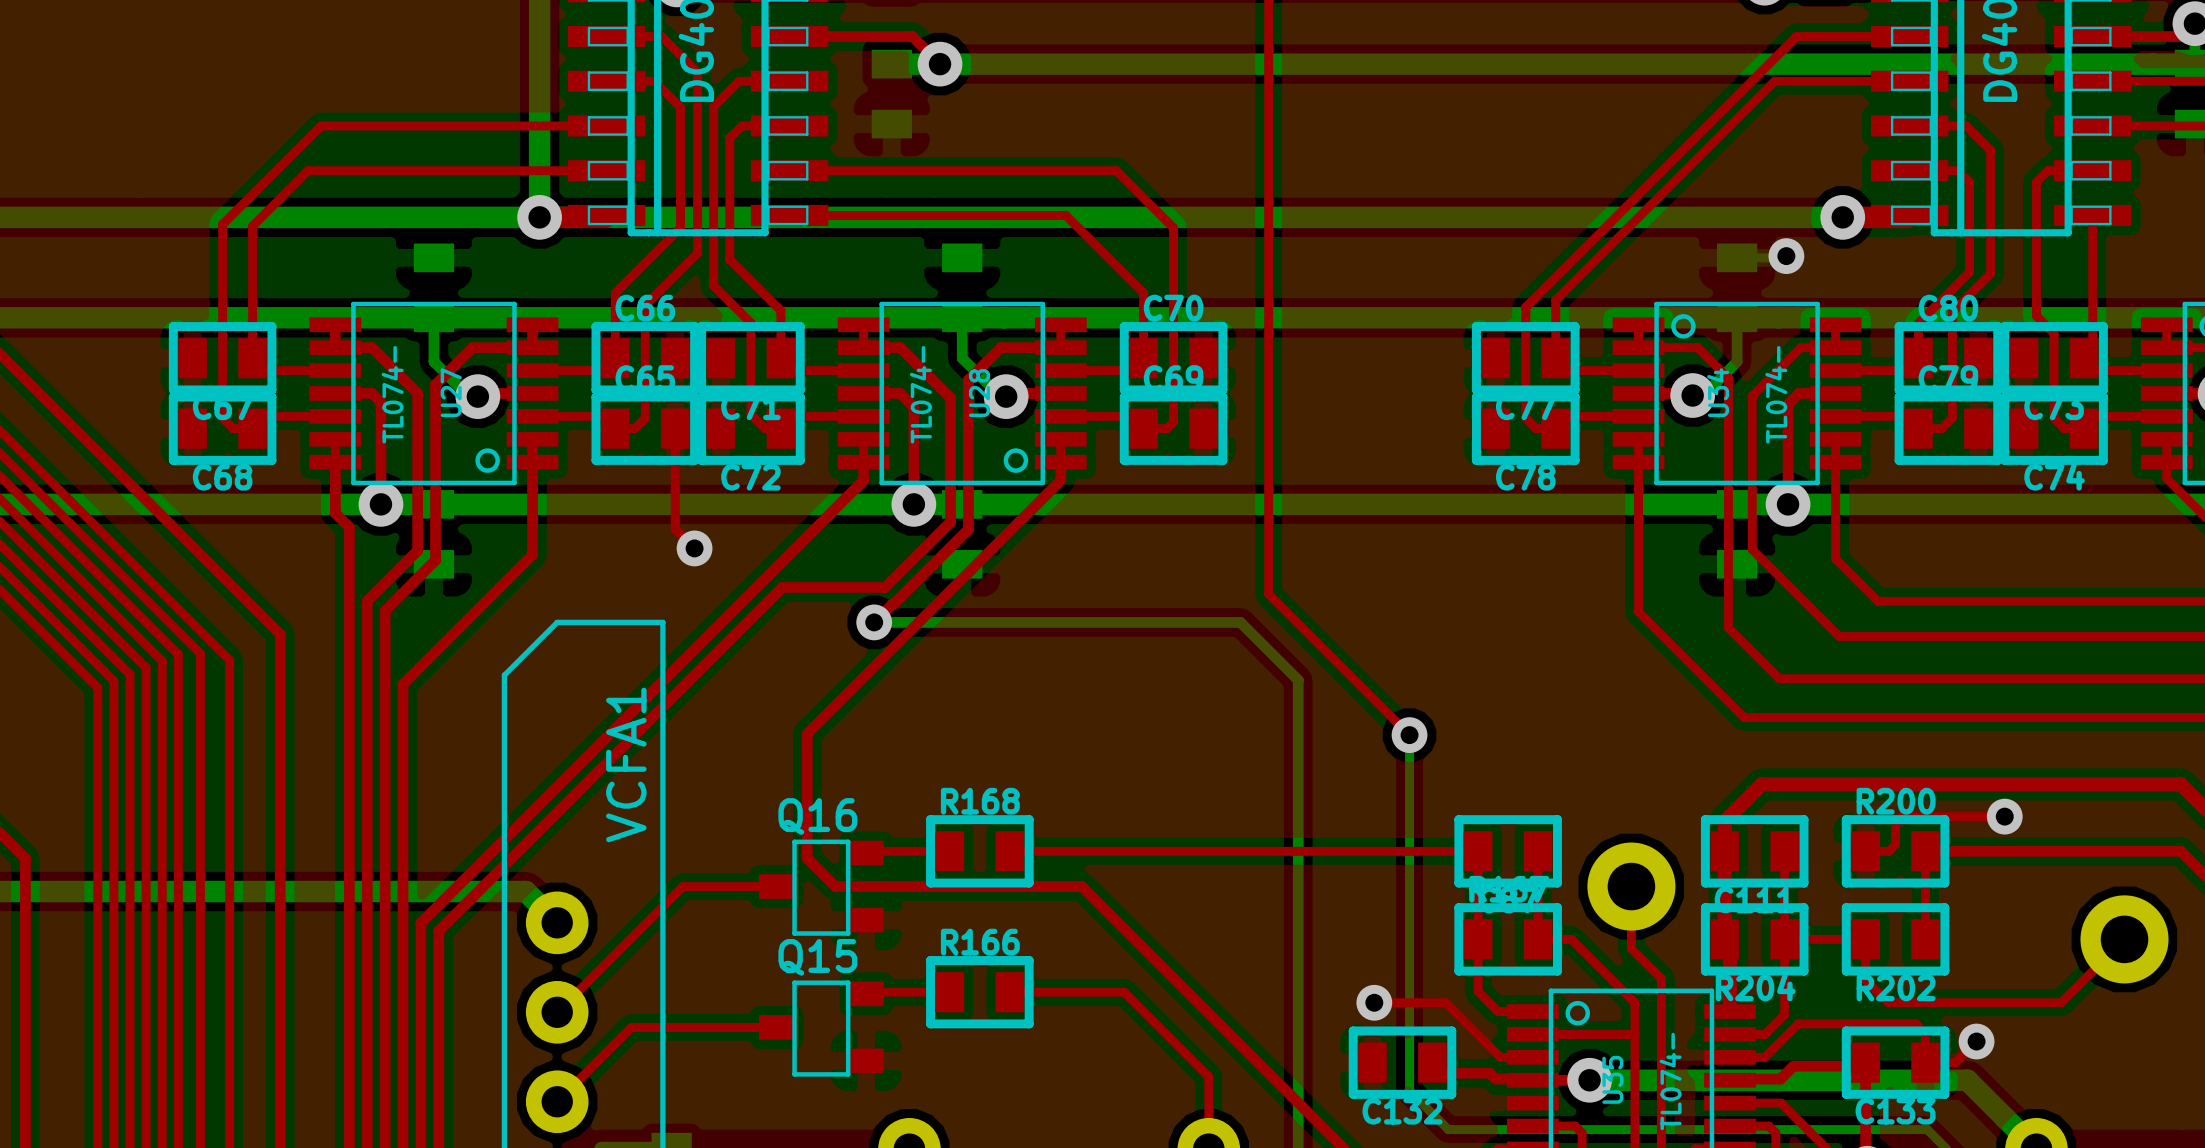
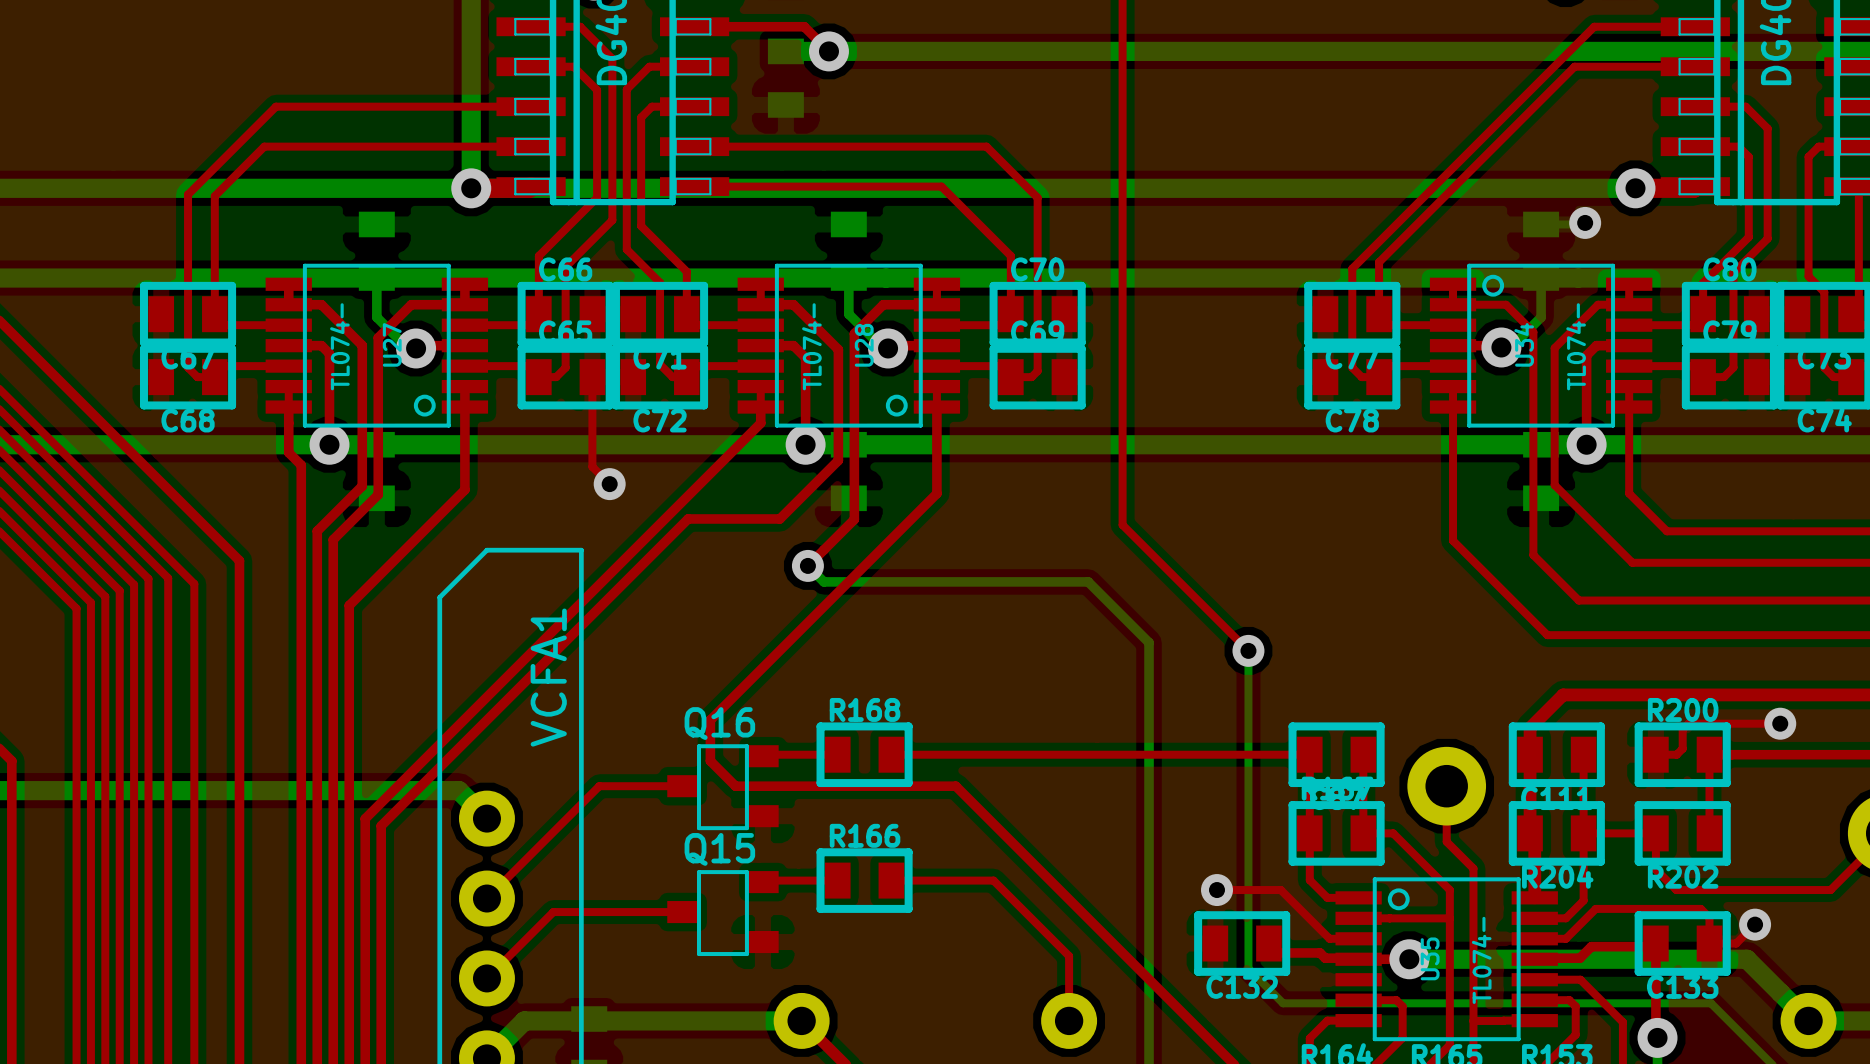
top track: (1060, 480) (807, 733) (807, 812) -> (936, 423) (936, 493) (710, 720)
top track: (968, 529) (874, 622) -> (854, 467) (854, 519) (807, 565)
bottom track: (874, 622) (1240, 622) (1298, 680) (1298, 725) -> (807, 565) (823, 581) (1088, 581) (1149, 642)
via position: (874, 622) -> (807, 565)

